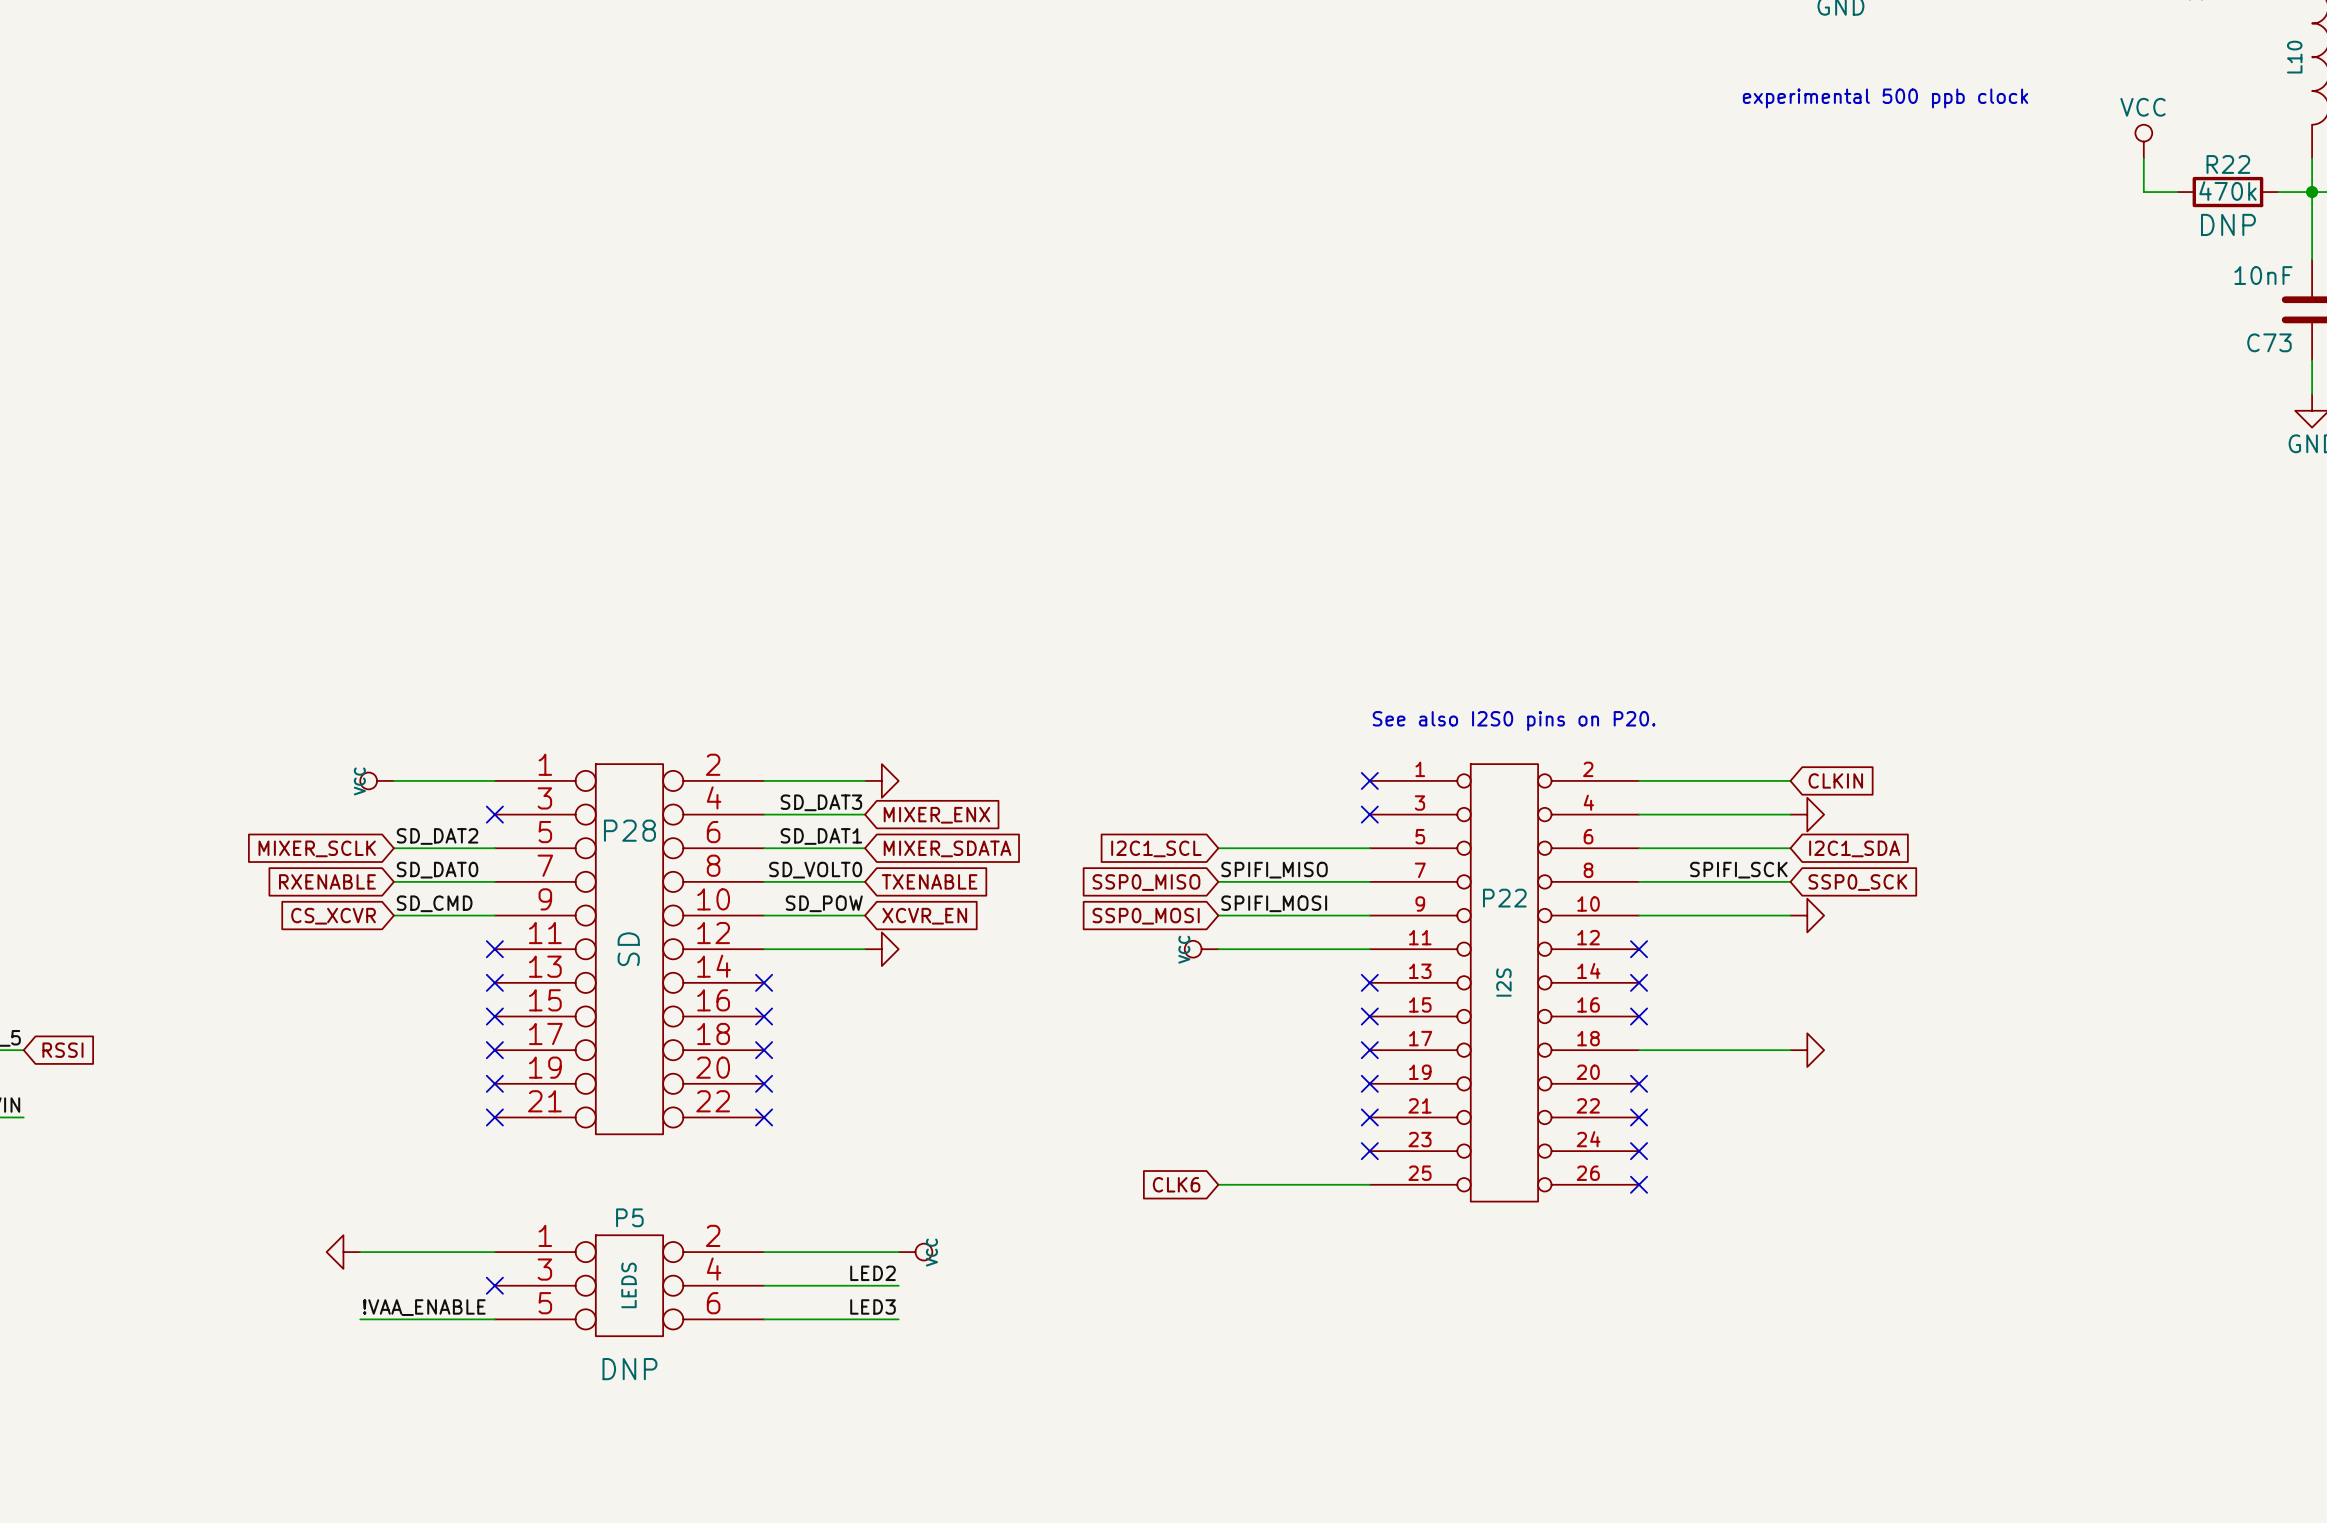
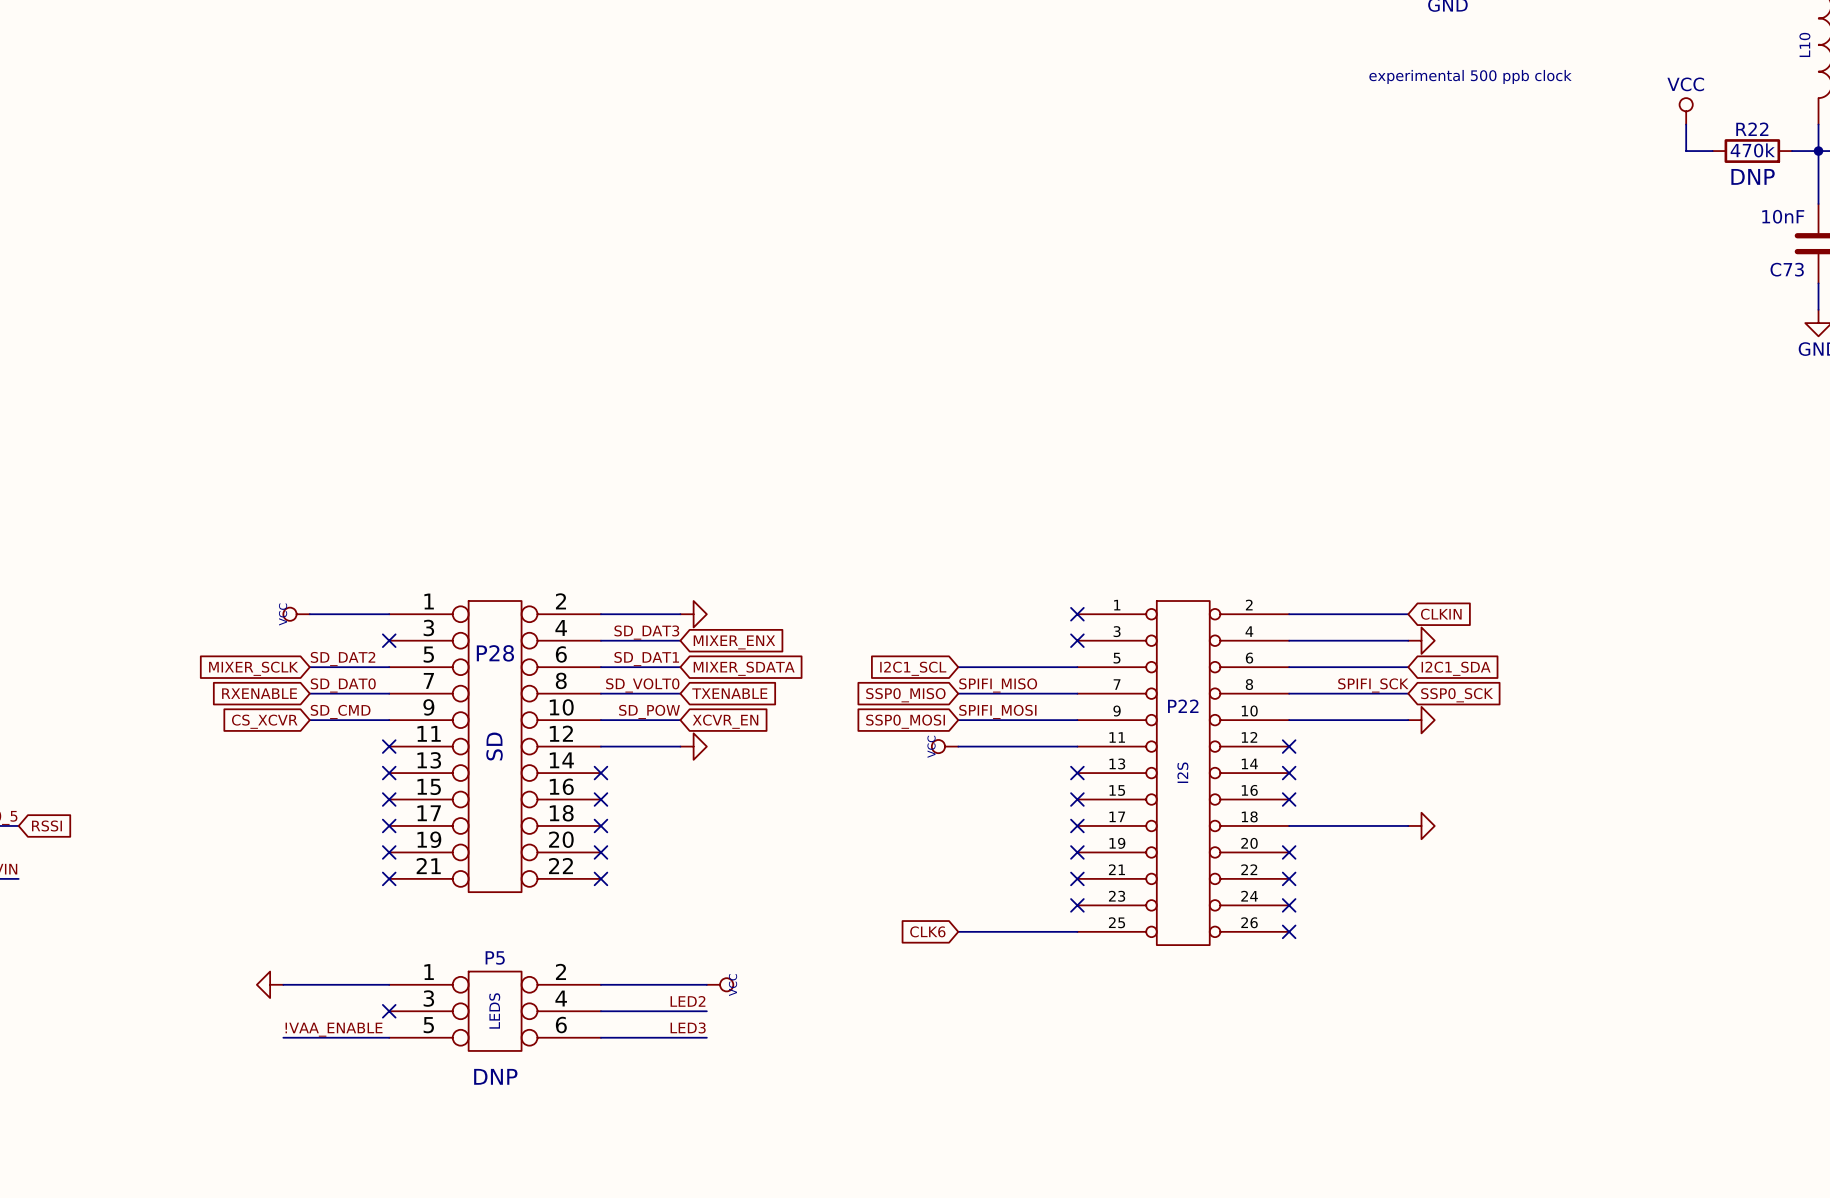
text: See also I2S0 pins on P20. (1514, 721) -> none

